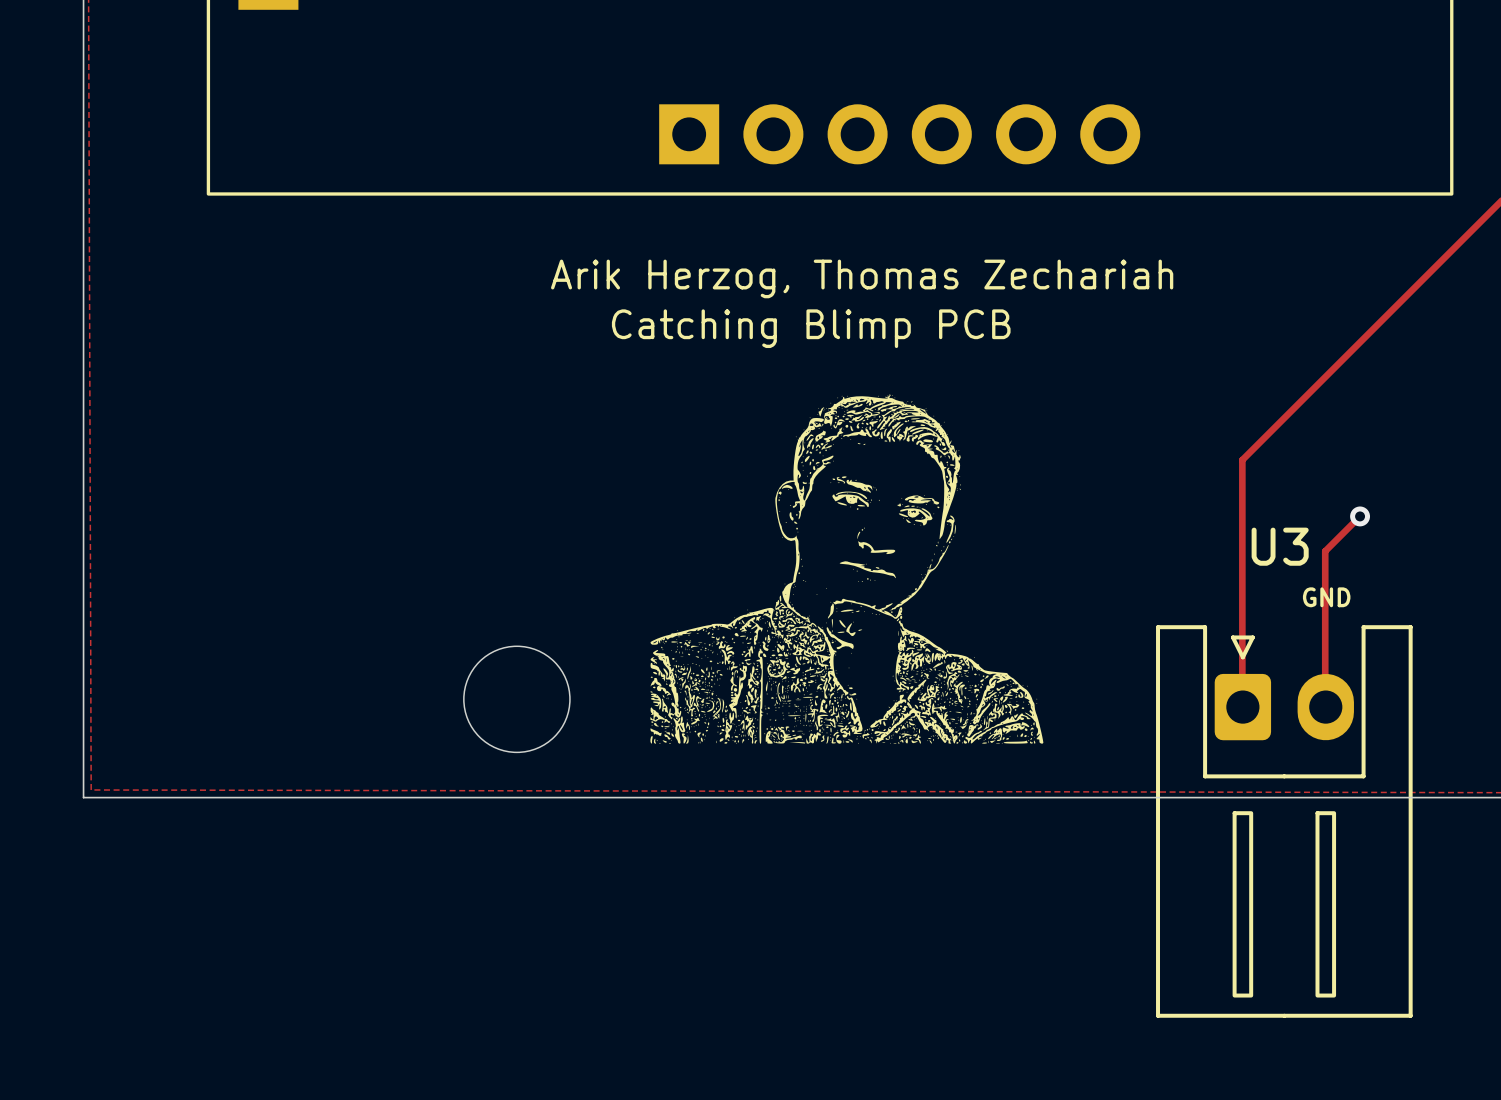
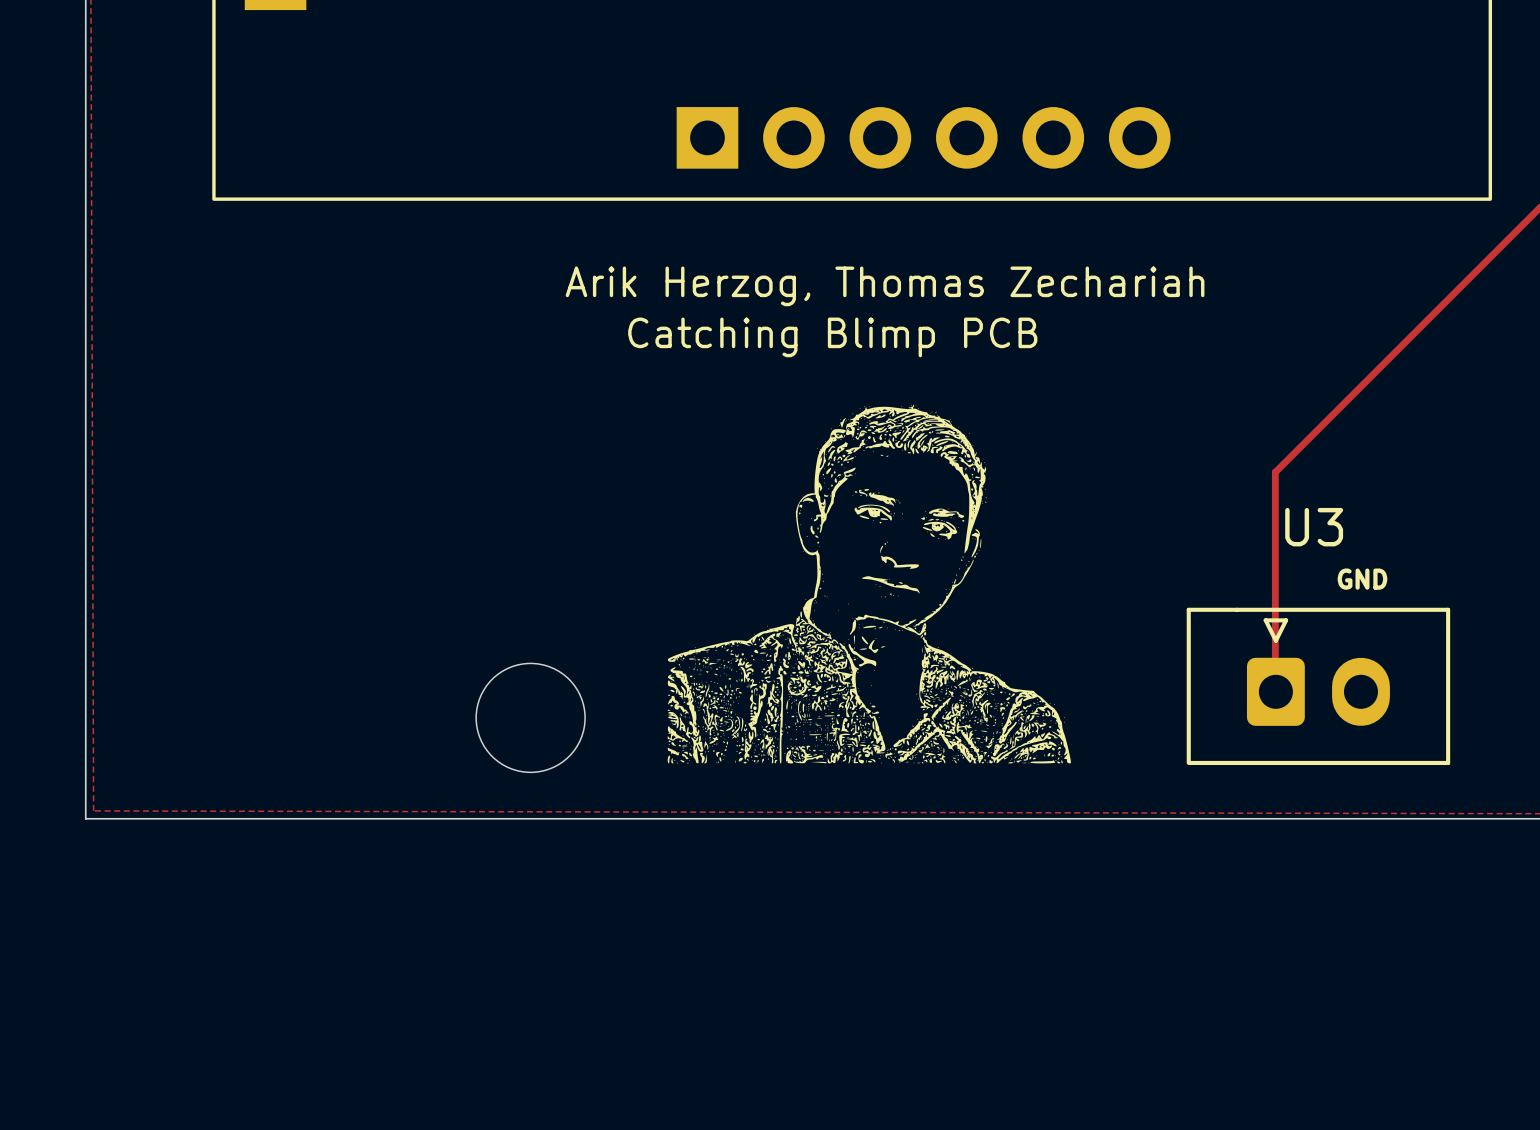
top track: (1360, 516) (1325, 551) (1325, 707) -> none
via: (1360, 516) -> none
U3 name position: U3 (1280, 546) -> U3 (1314, 527)
U3 footprint: [1156, 625, 1413, 1018] -> [1186, 607, 1451, 766]

